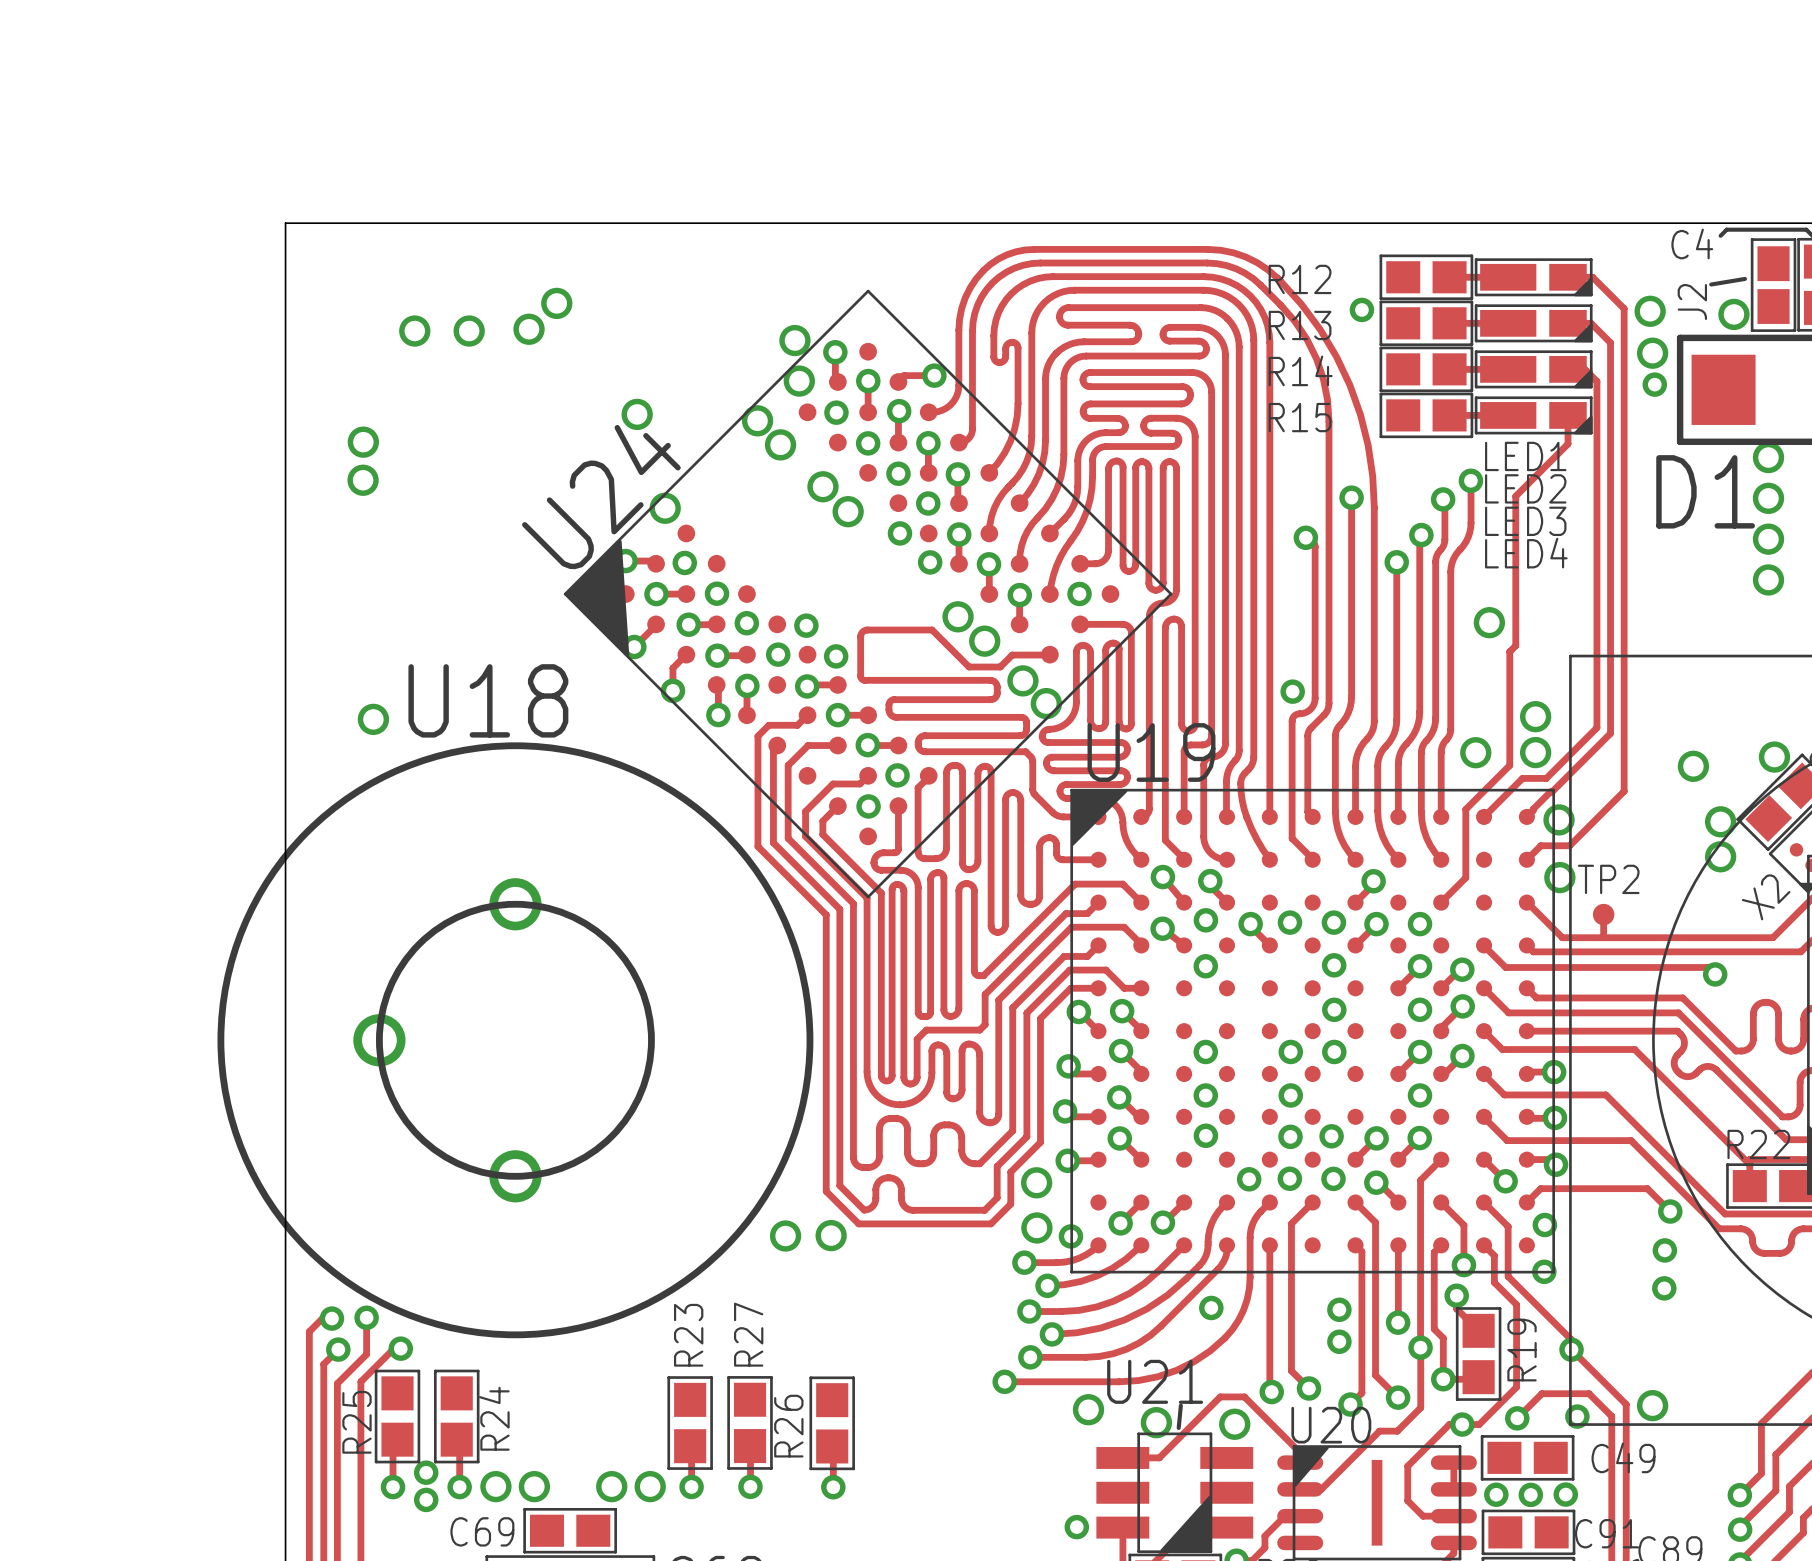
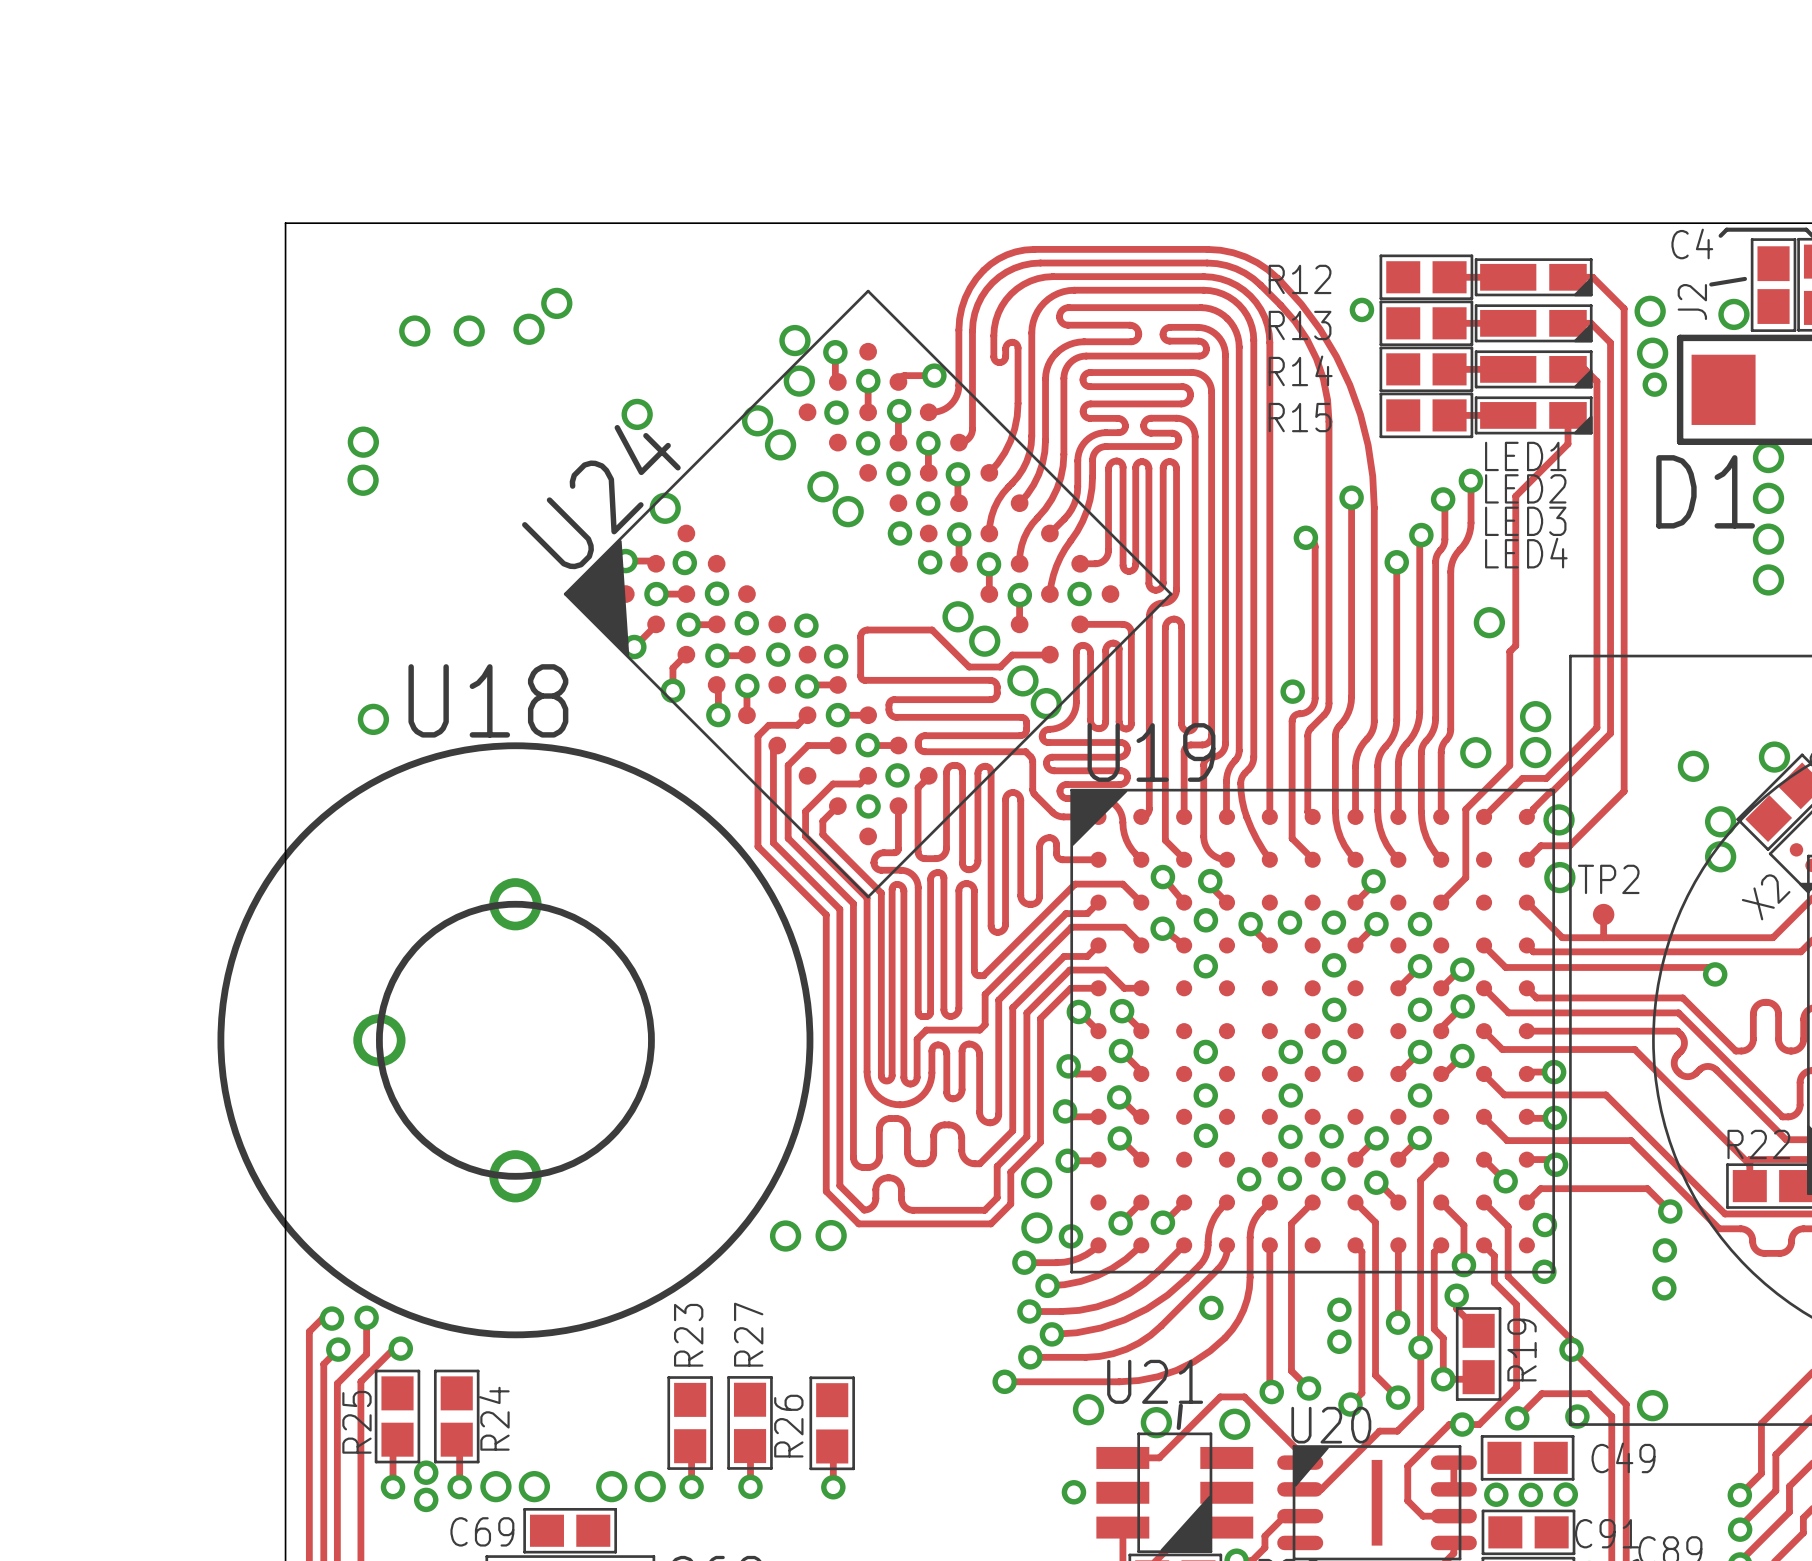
via position: (1076, 1527) -> (1073, 1492)

